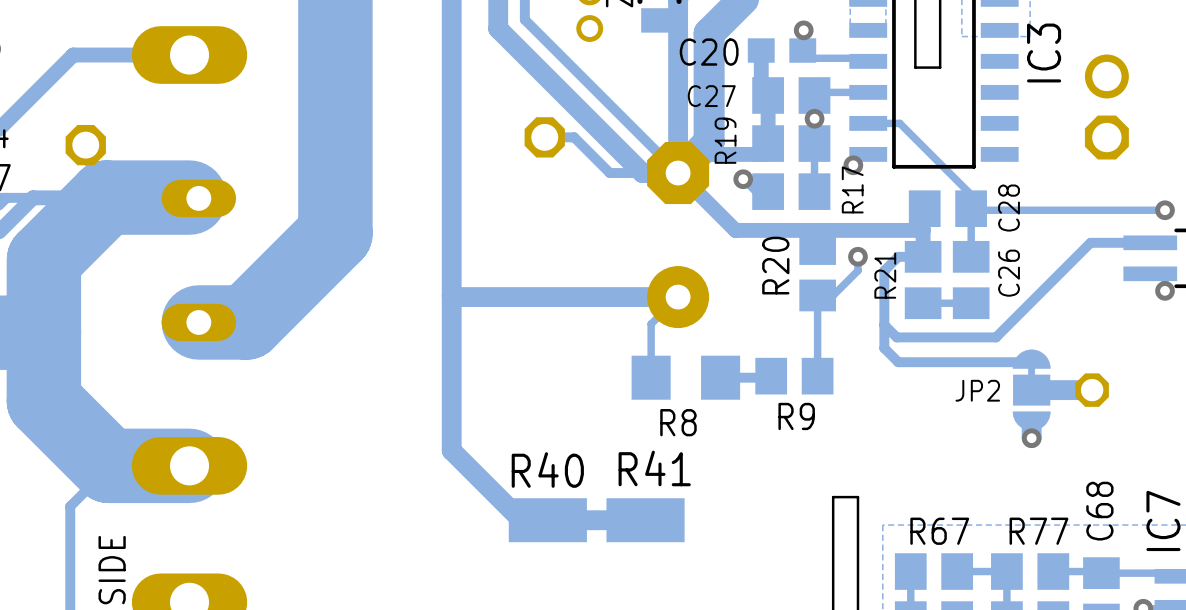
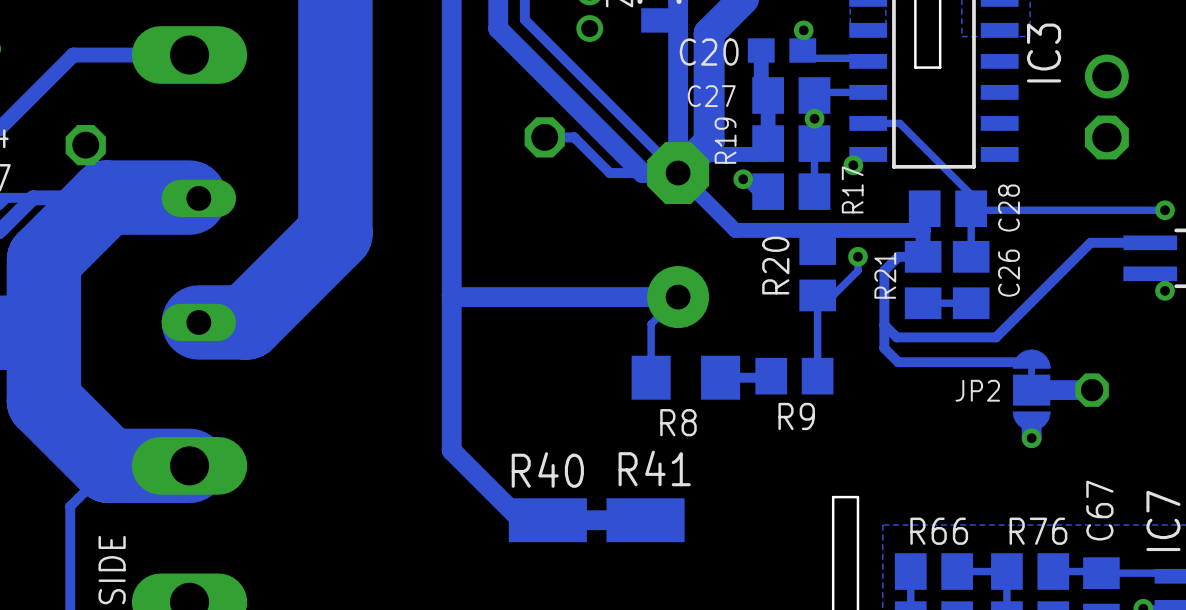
C68 name: C68 (1099, 511) -> C67 (1099, 510)
R67 name: R67 (939, 531) -> R66 (939, 531)
R77 name: R77 (1038, 531) -> R76 (1038, 531)

